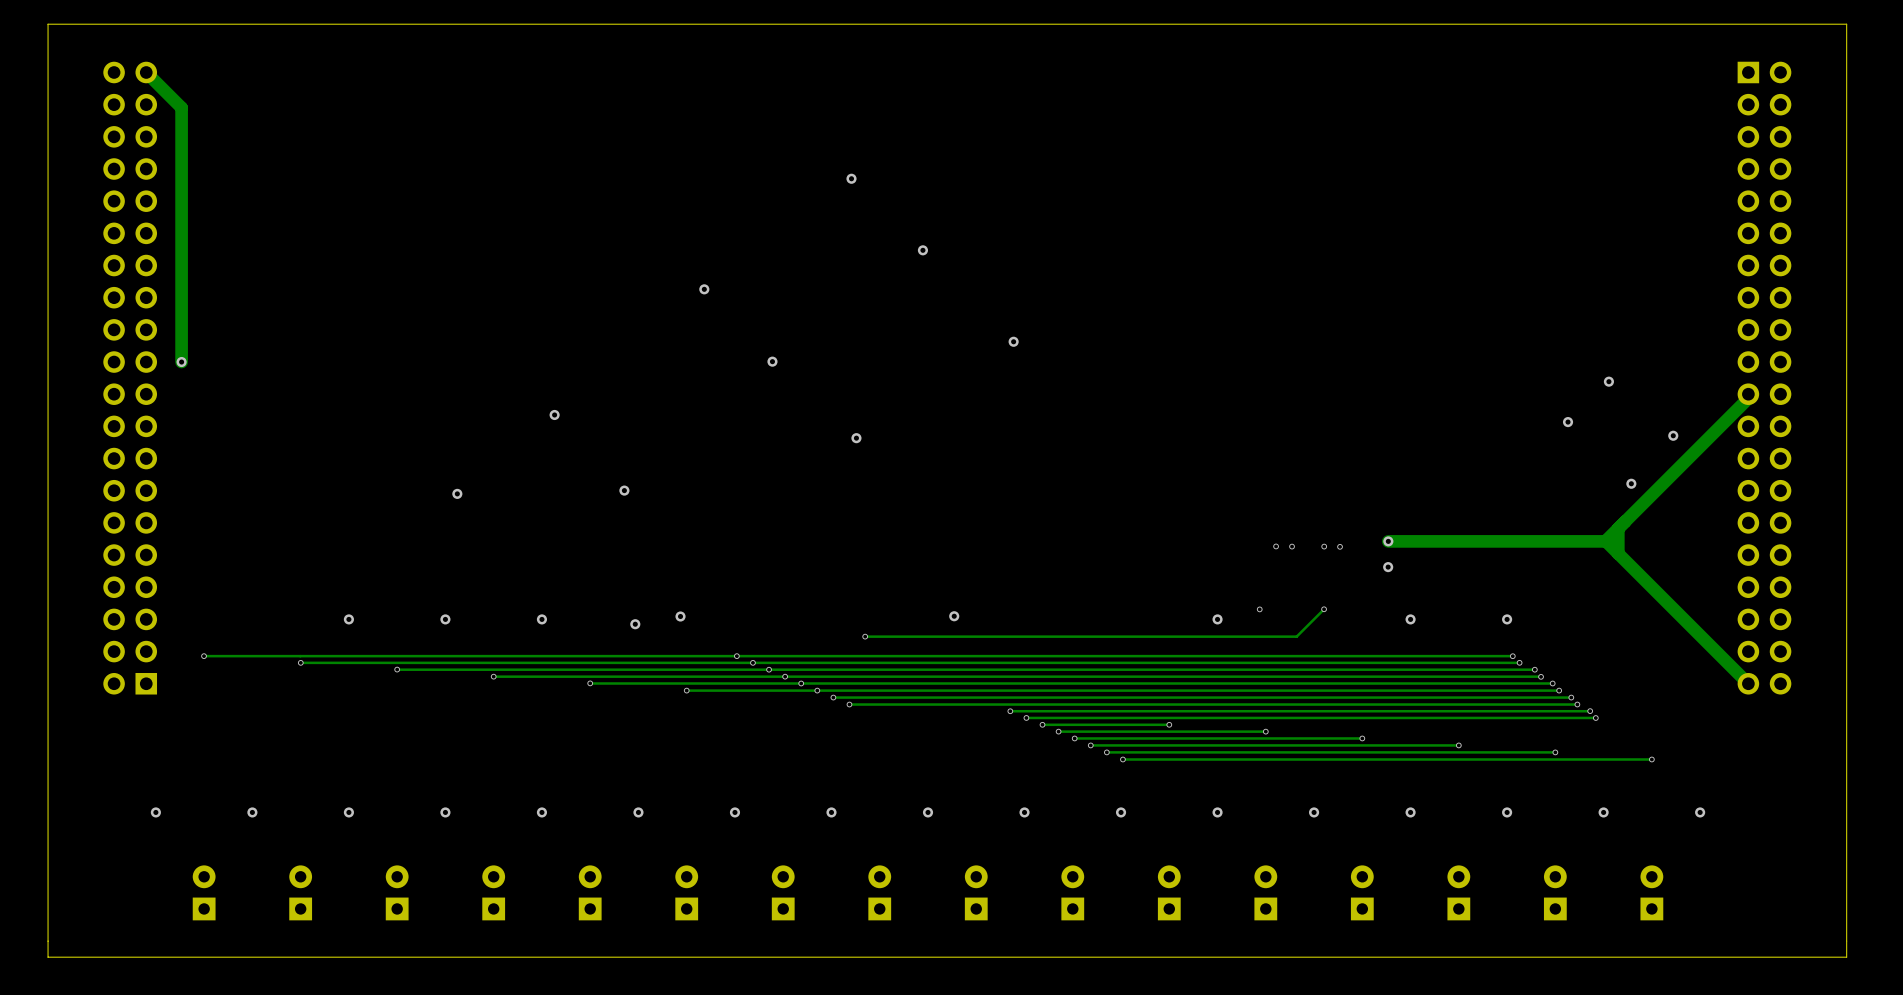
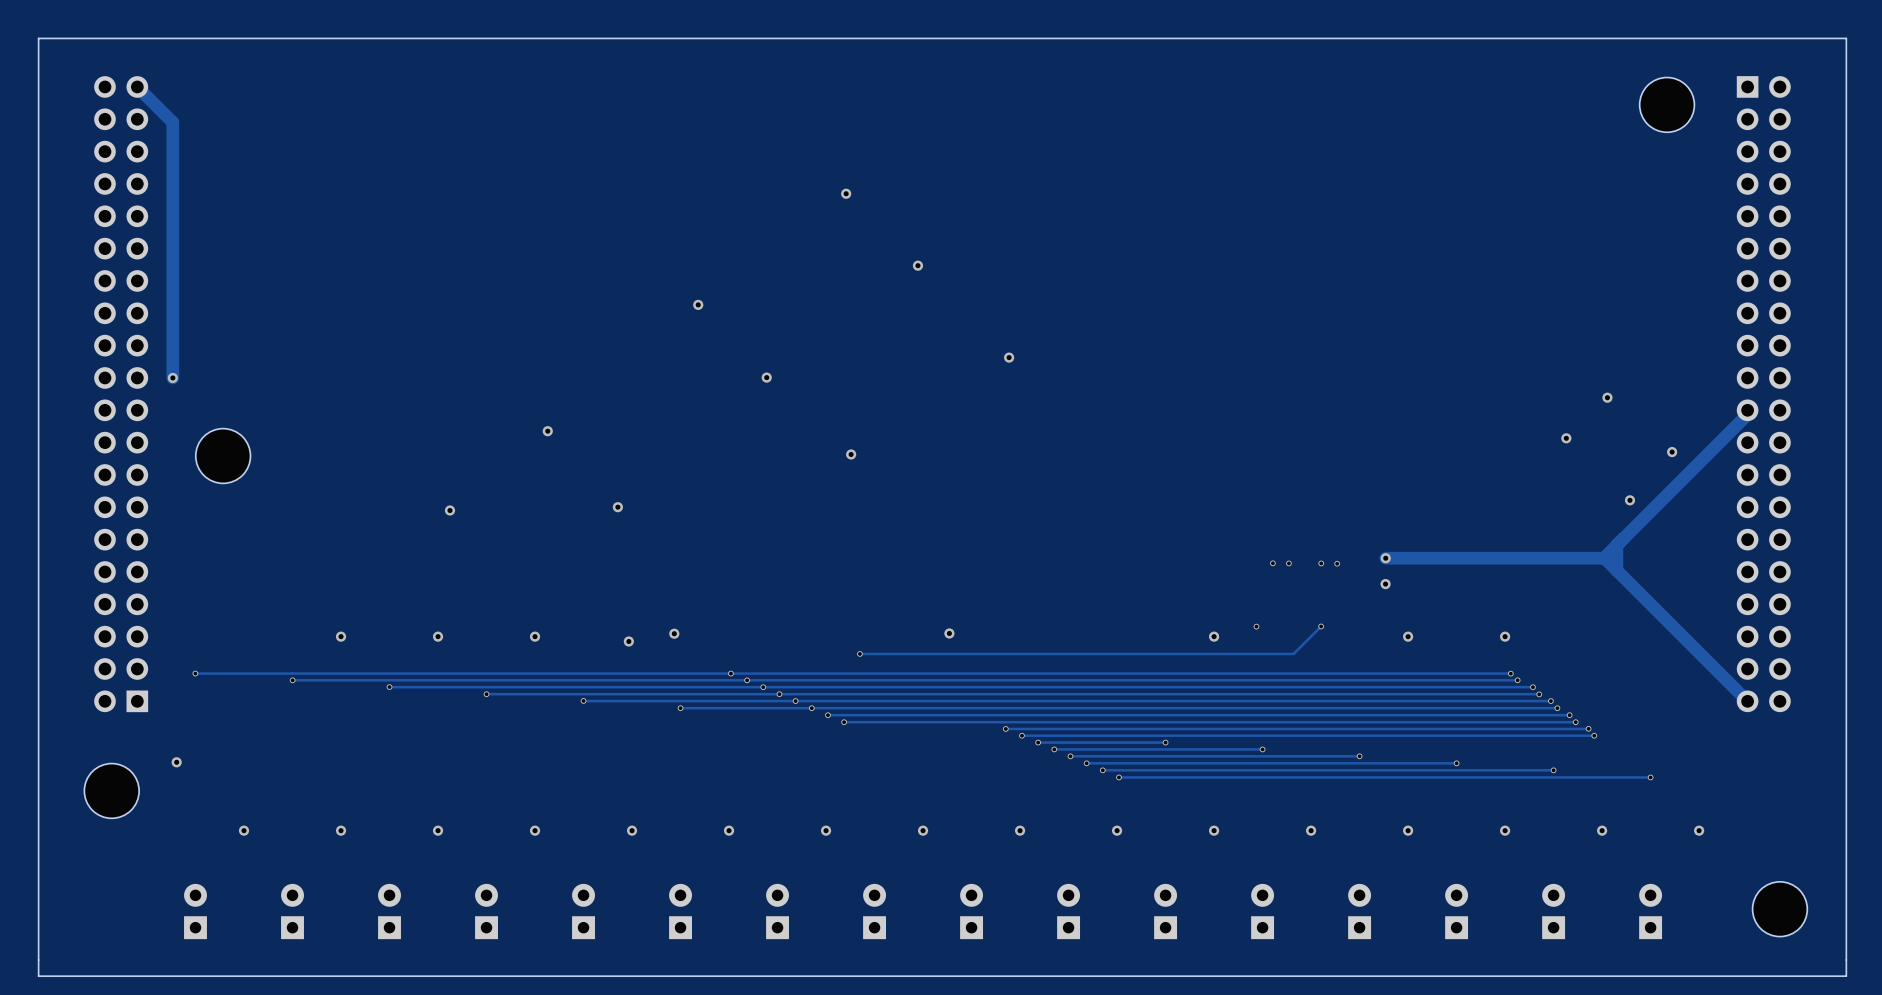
part: none -> (1667, 104)
part: none -> (223, 456)
part: none -> (111, 790)
via position: (155, 812) -> (176, 762)
part: none -> (1779, 909)

